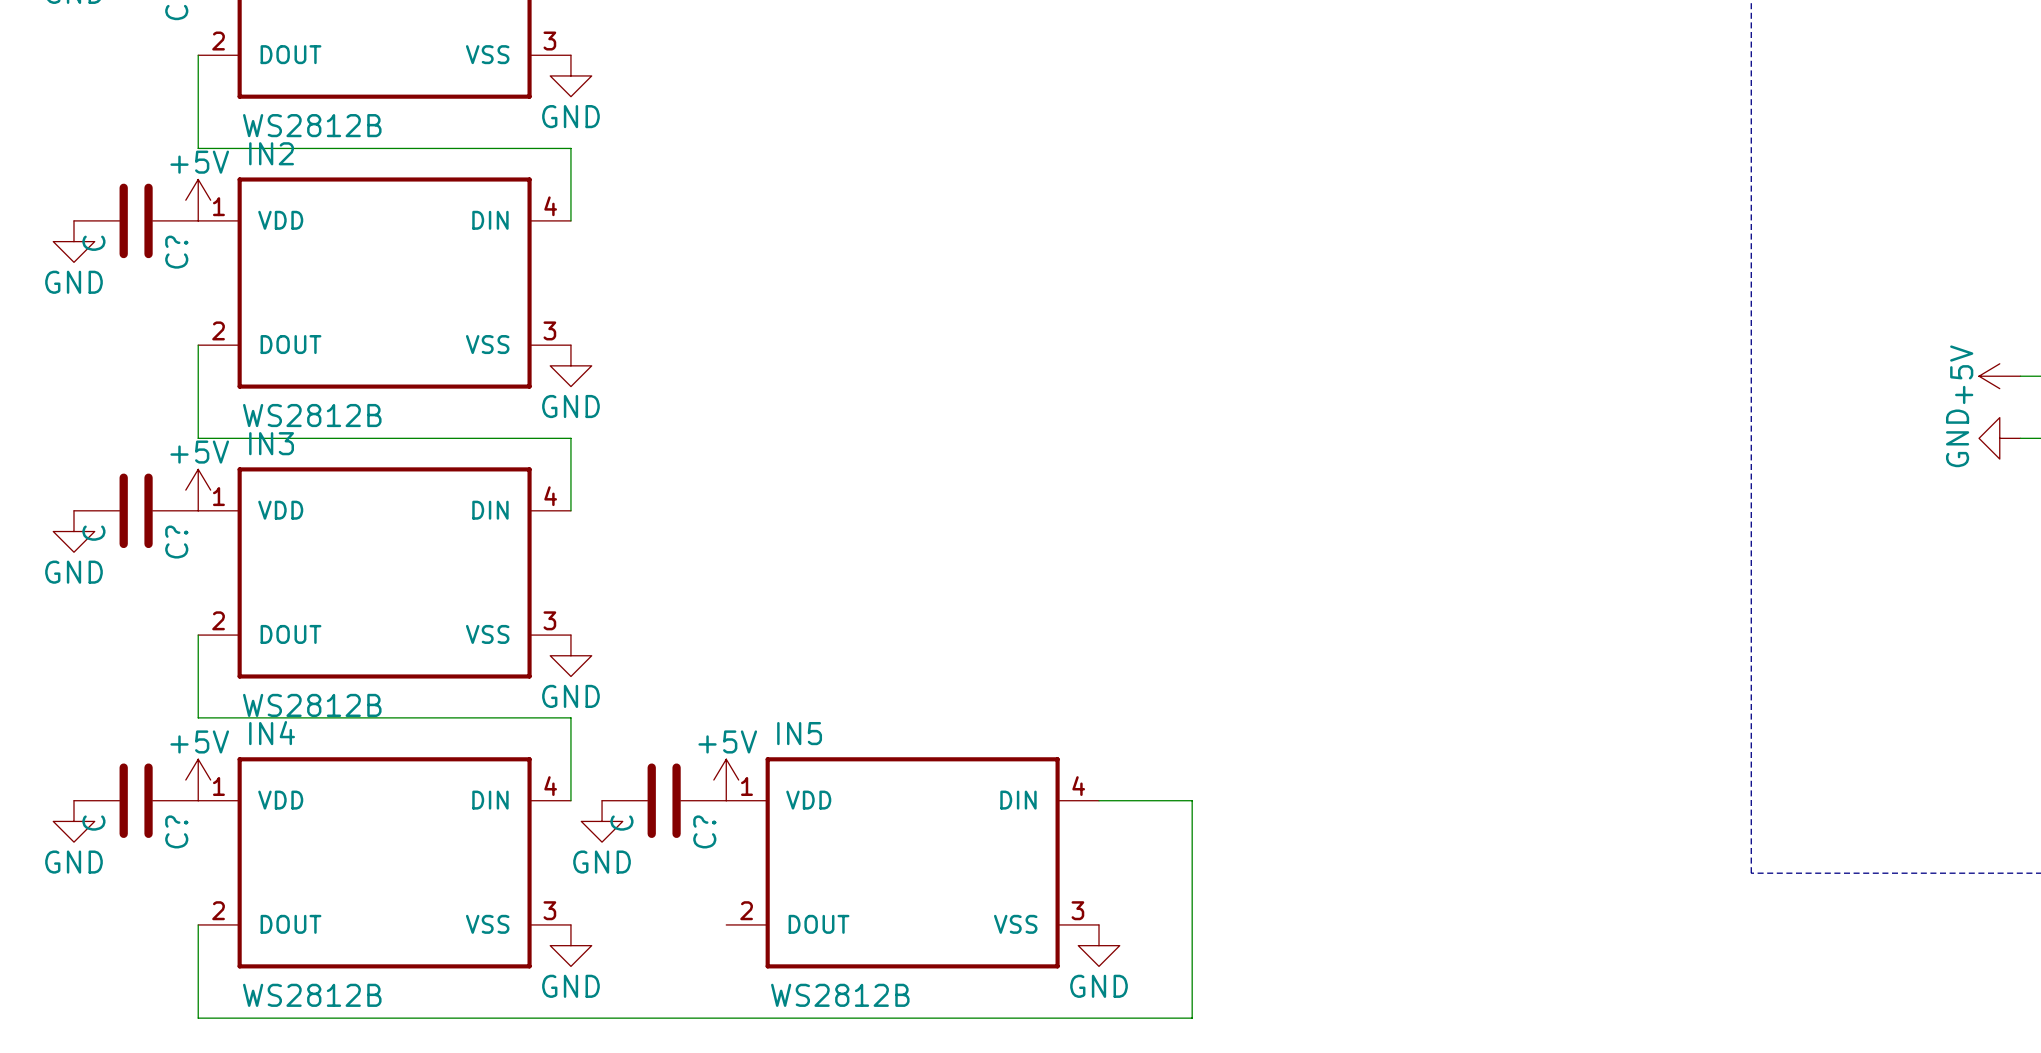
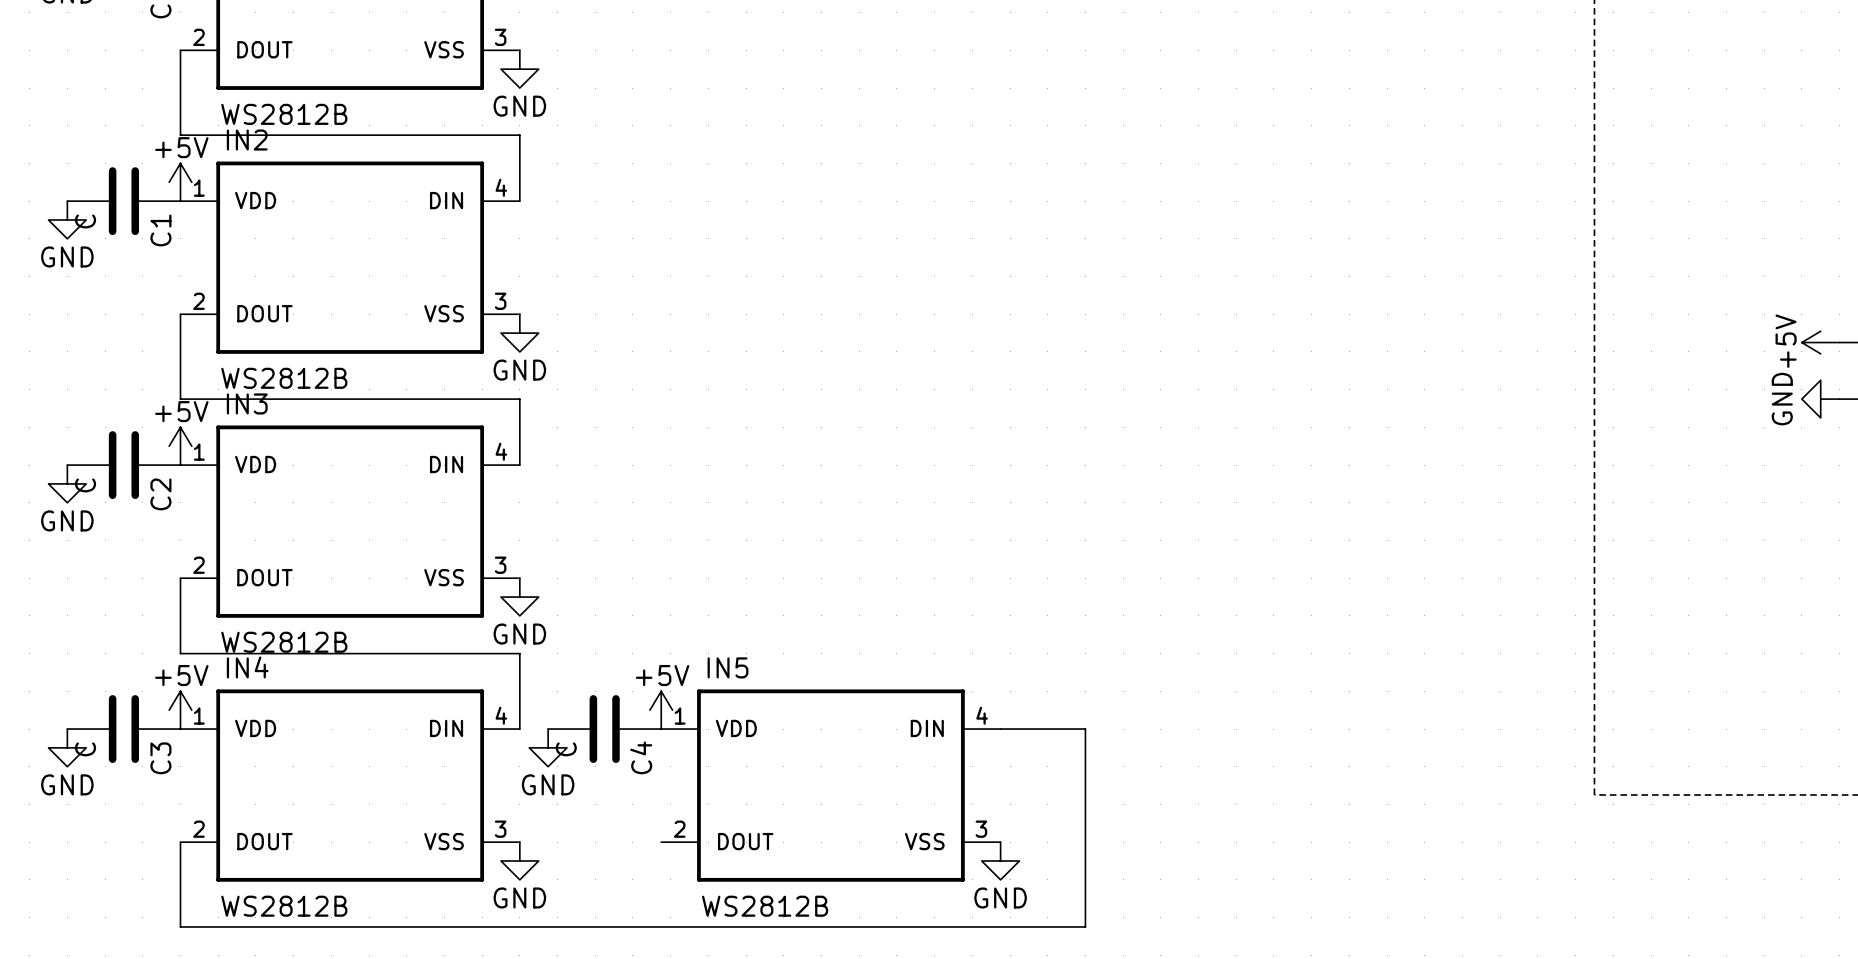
C? name: C? (176, 252) -> C1 (160, 230)
C? name: C? (176, 542) -> C2 (160, 494)
C? name: C? (176, 831) -> C3 (160, 758)
C? name: C? (704, 831) -> C4 (641, 757)

